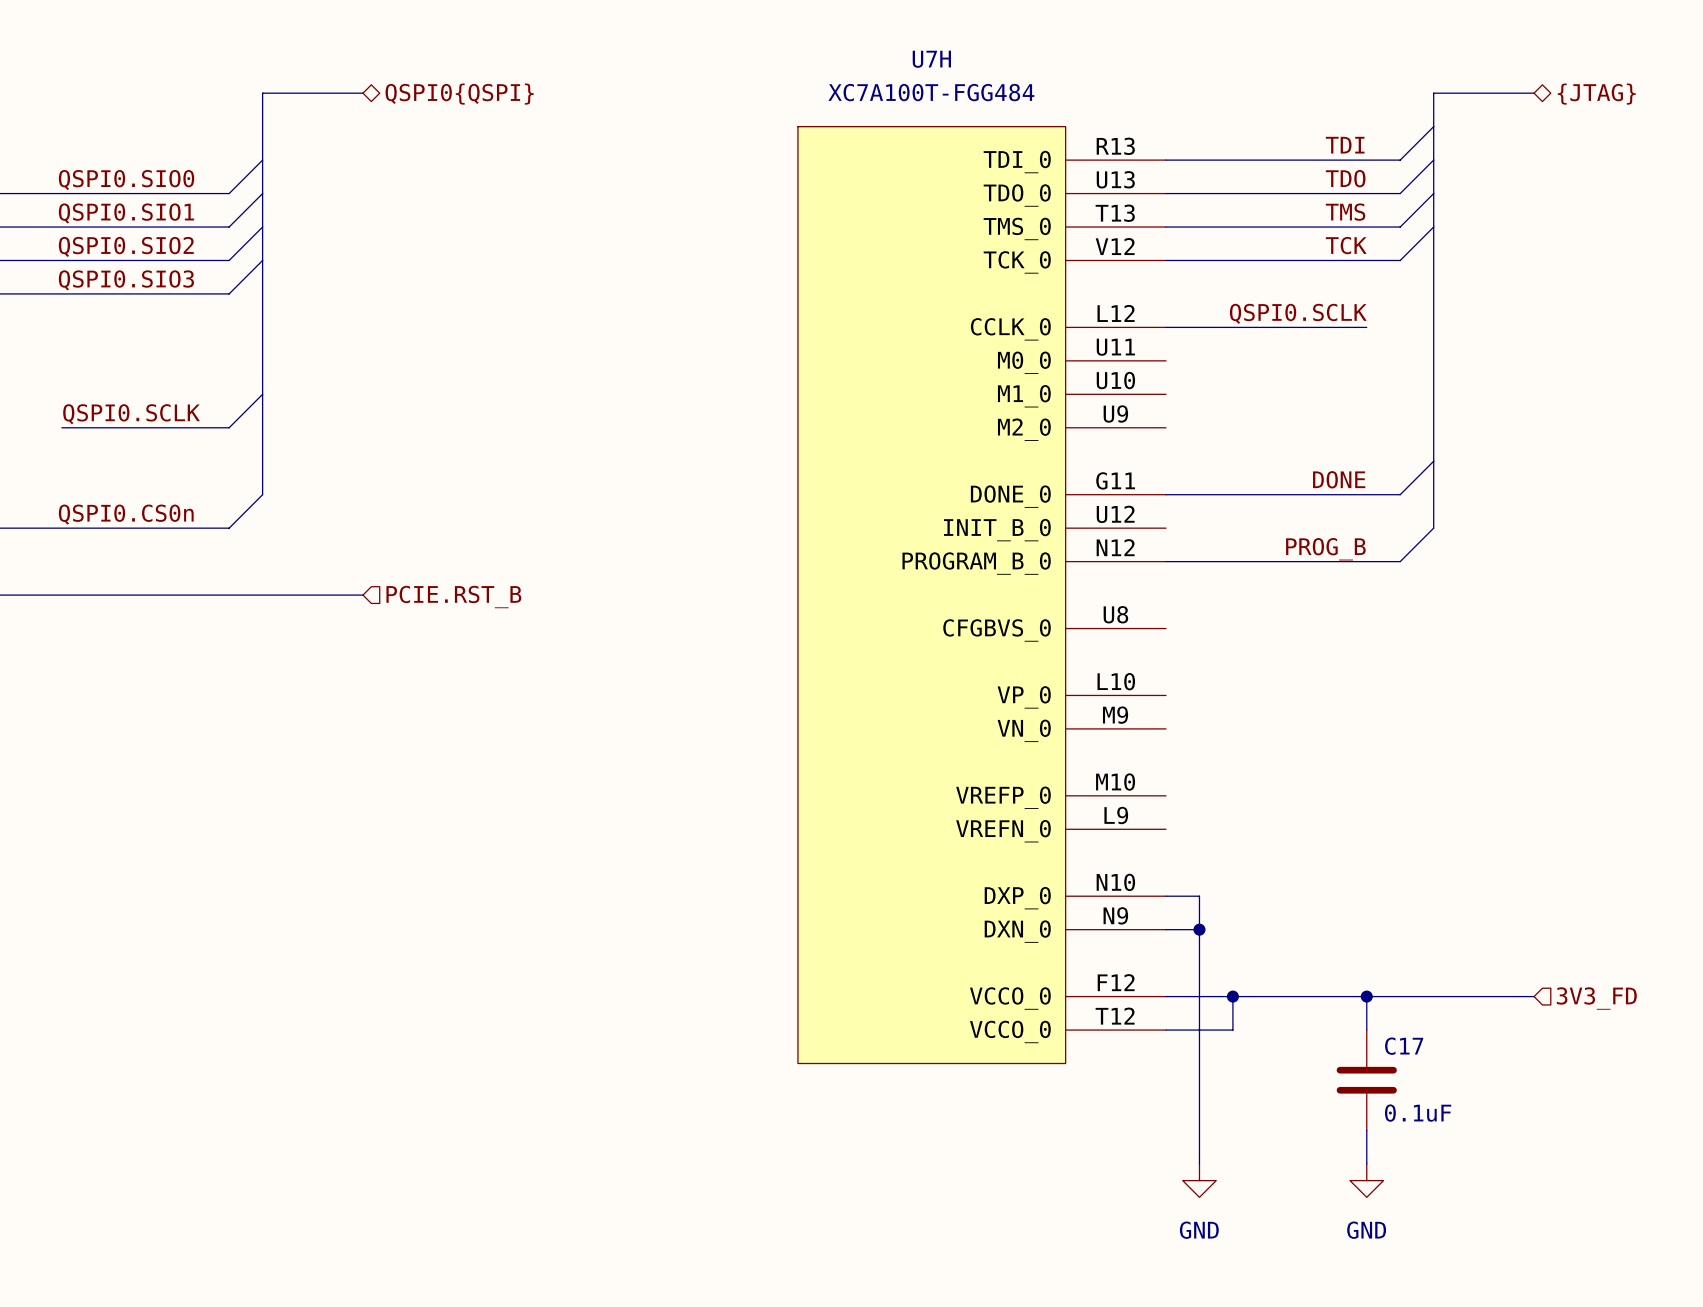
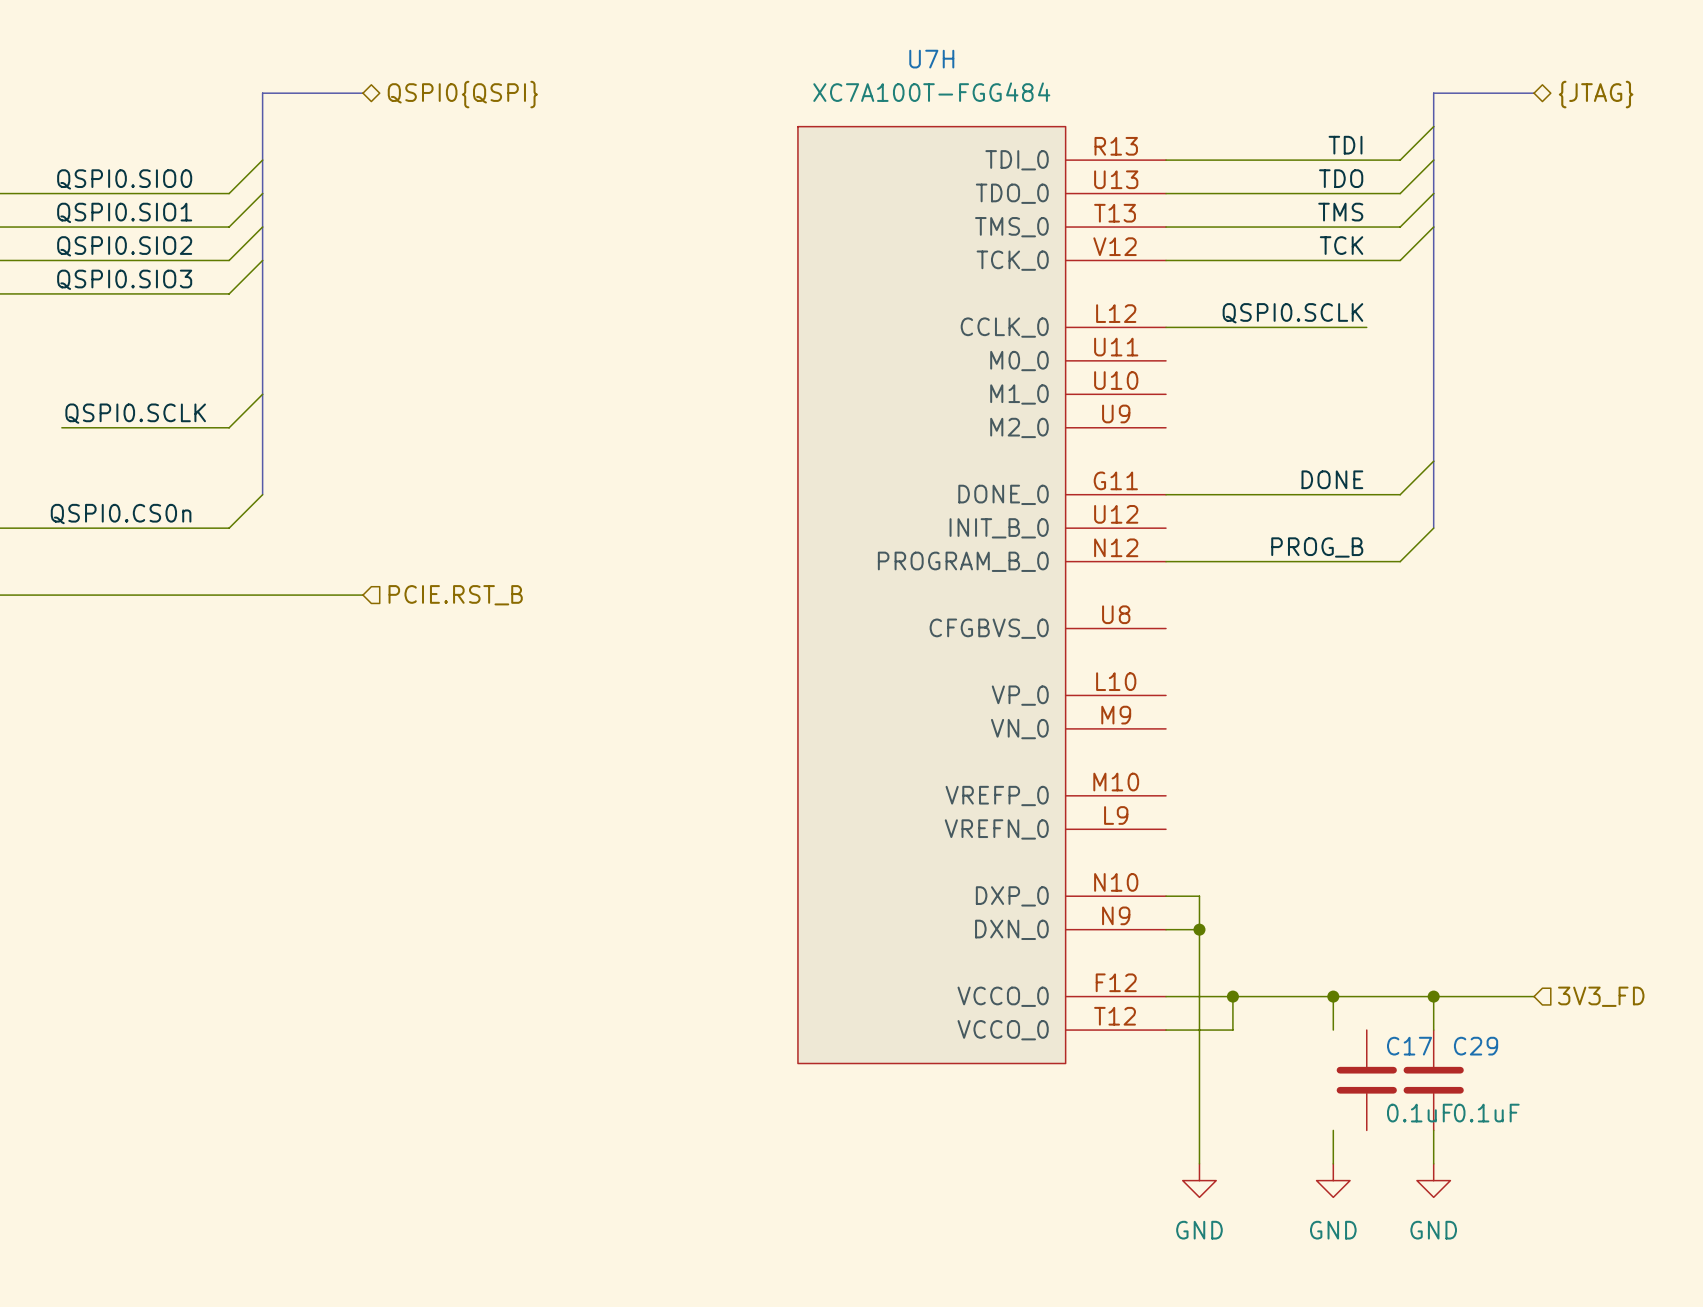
junction: none -> (1333, 996)
wire: (1366, 996) (1366, 1030) -> (1333, 996) (1333, 1030)
junction: (1366, 996) -> none
wire: none -> (1433, 996) (1433, 1030)
junction: none -> (1433, 996)
C29: none -> 0.1uF (1433, 1080)
wire: (1366, 1130) (1366, 1163) -> (1333, 1130) (1333, 1163)
wire: none -> (1433, 1130) (1433, 1163)
power symbol: none -> GND (1333, 1180)
power symbol: GND (1366, 1180) -> none
power symbol: none -> GND (1433, 1180)

